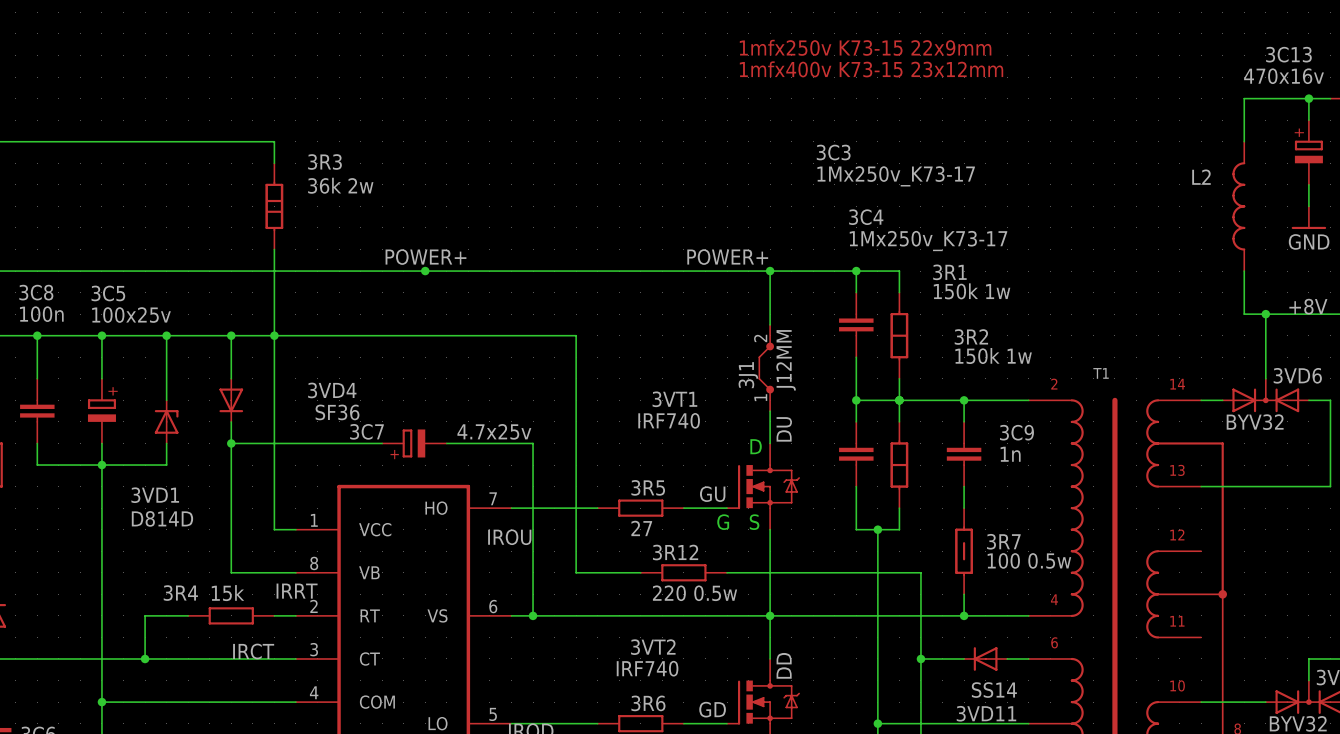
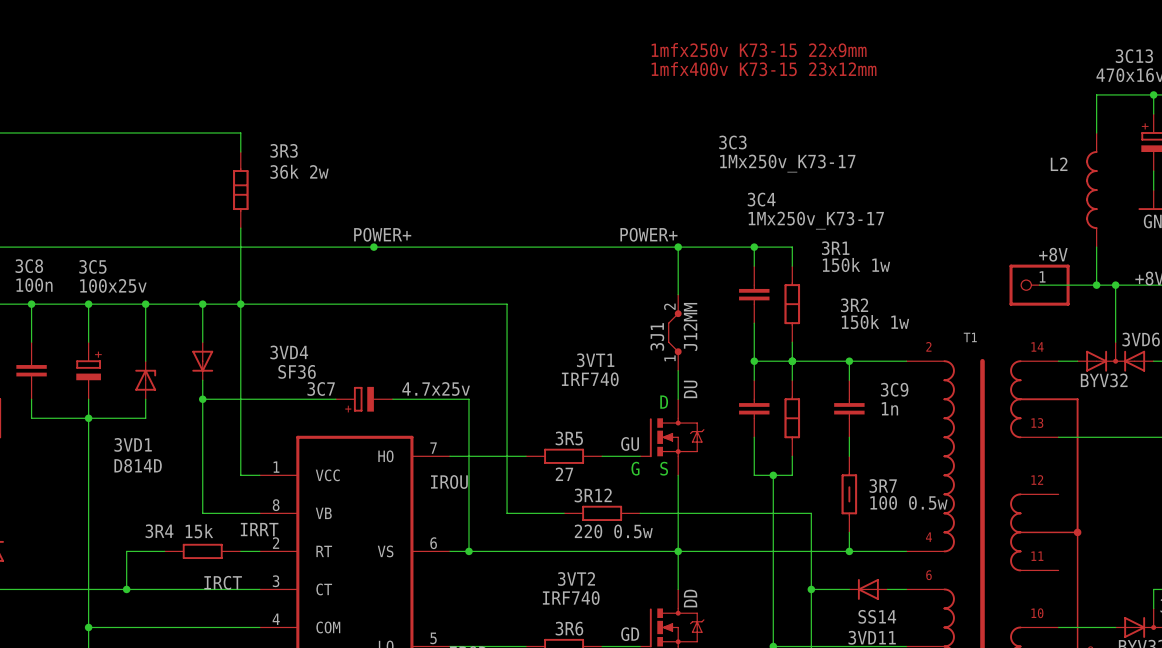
wire: none -> (1039, 285) (1096, 285)
+8V: none -> (1039, 285)
junction: none -> (1096, 285)

